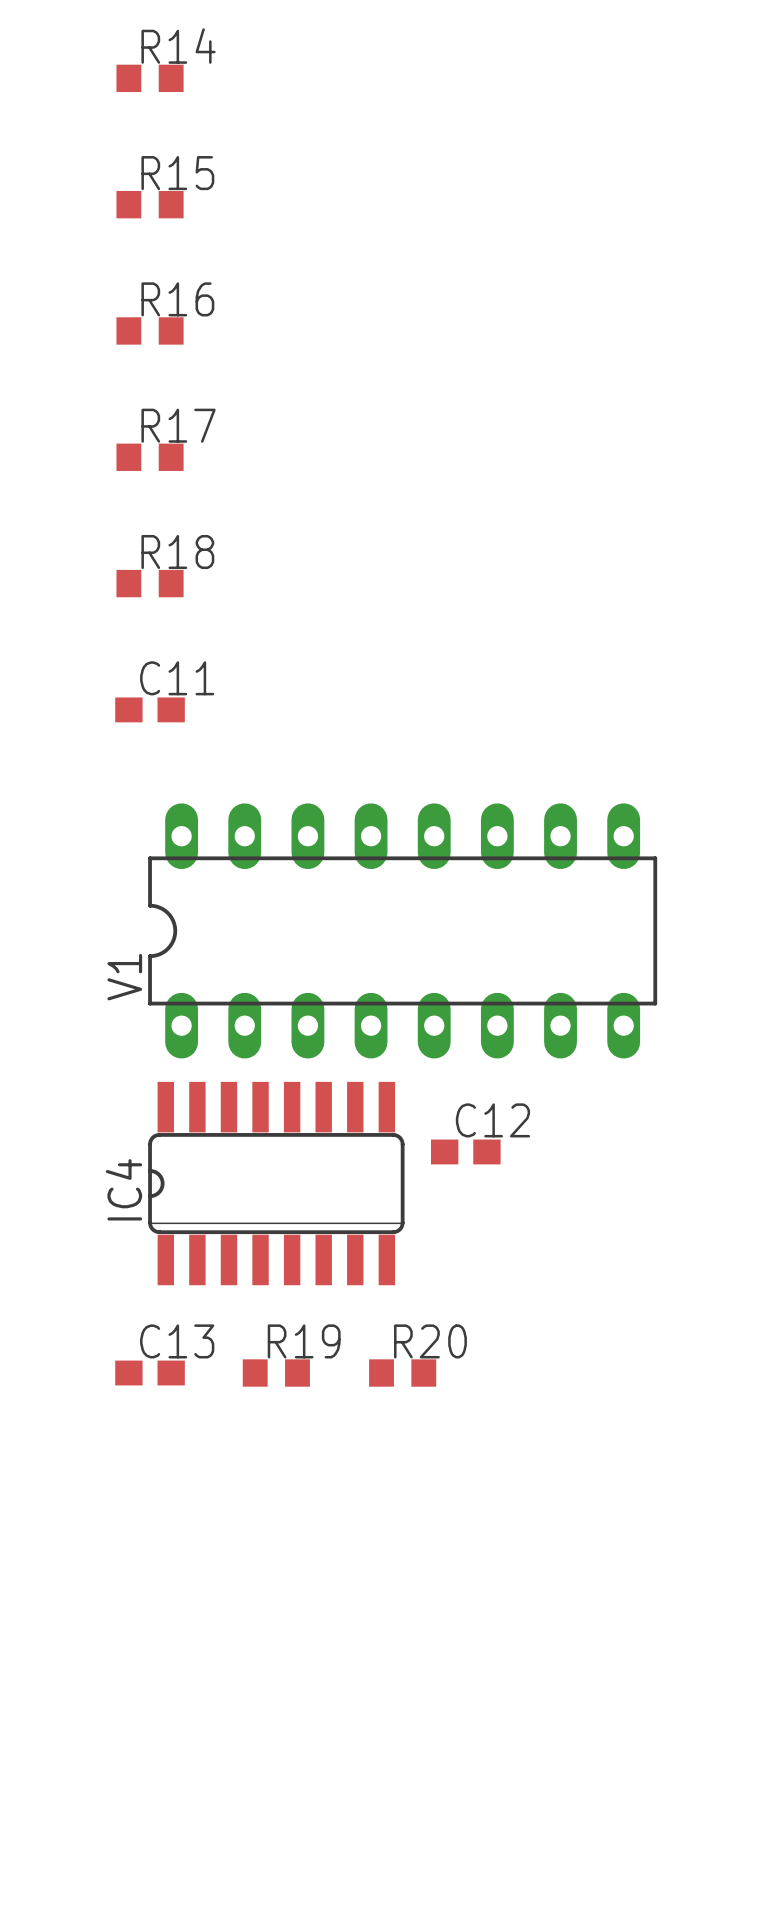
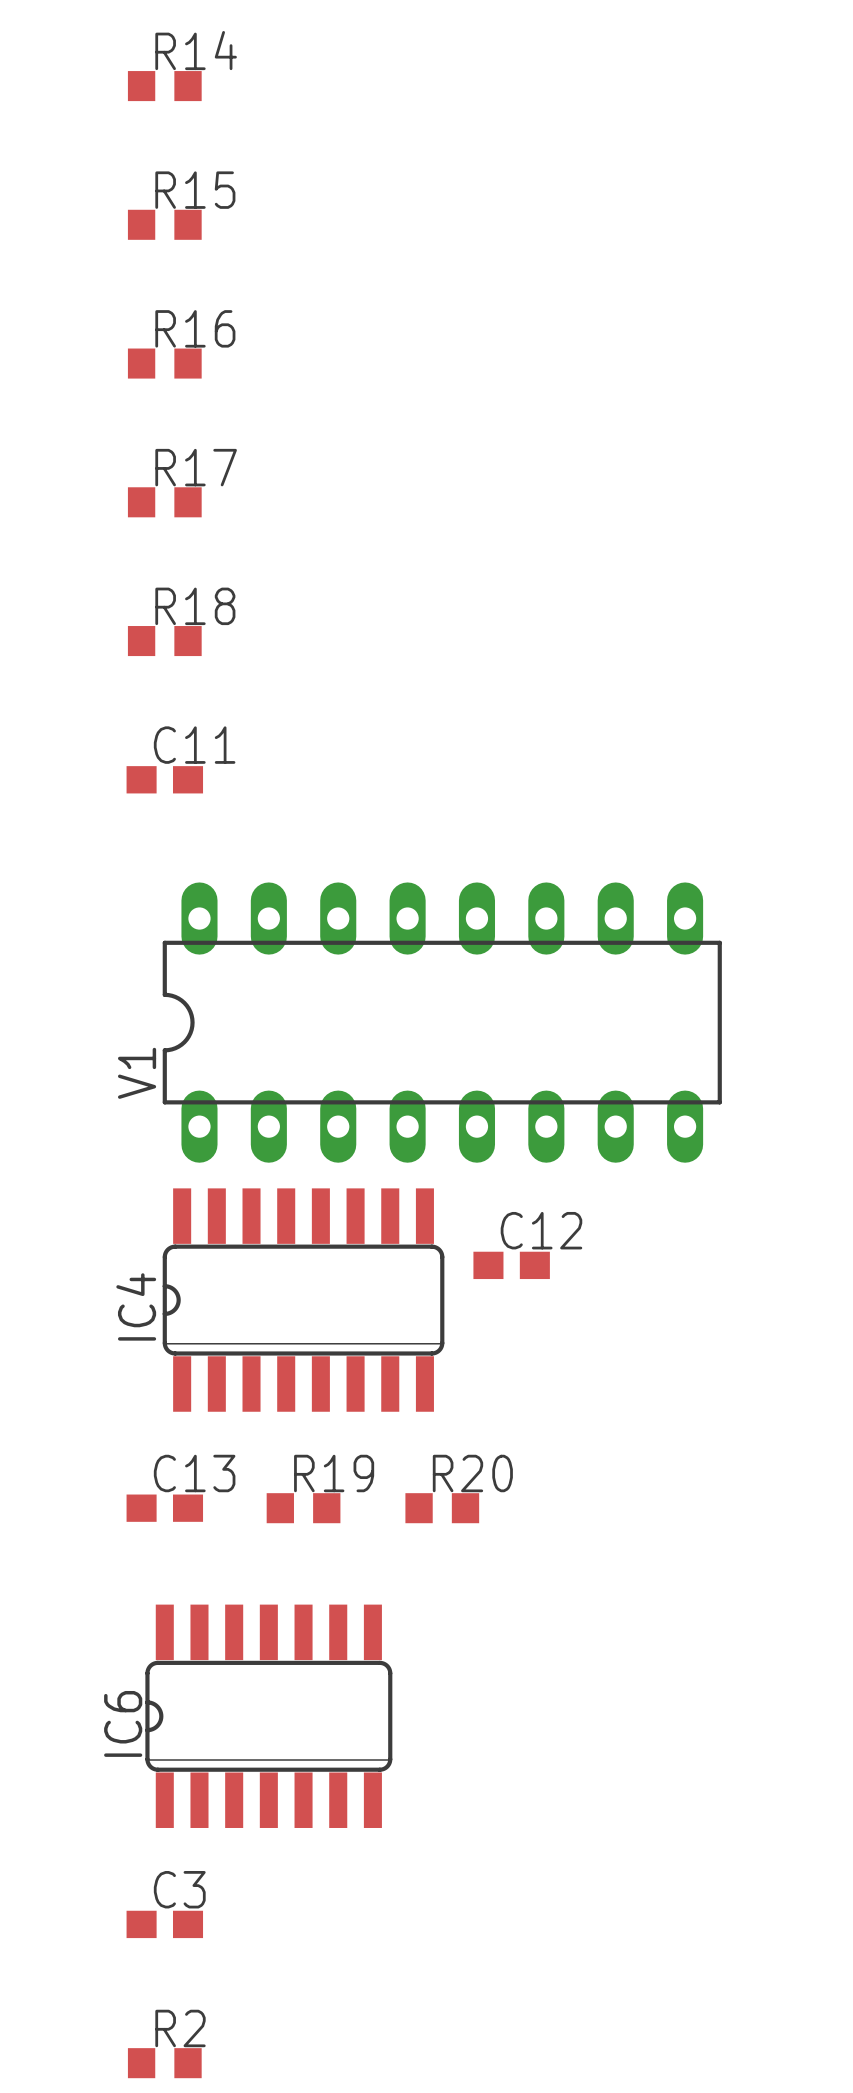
IC6: none -> (268, 1716)
C3: none -> (164, 1924)
R2: none -> (164, 2063)

